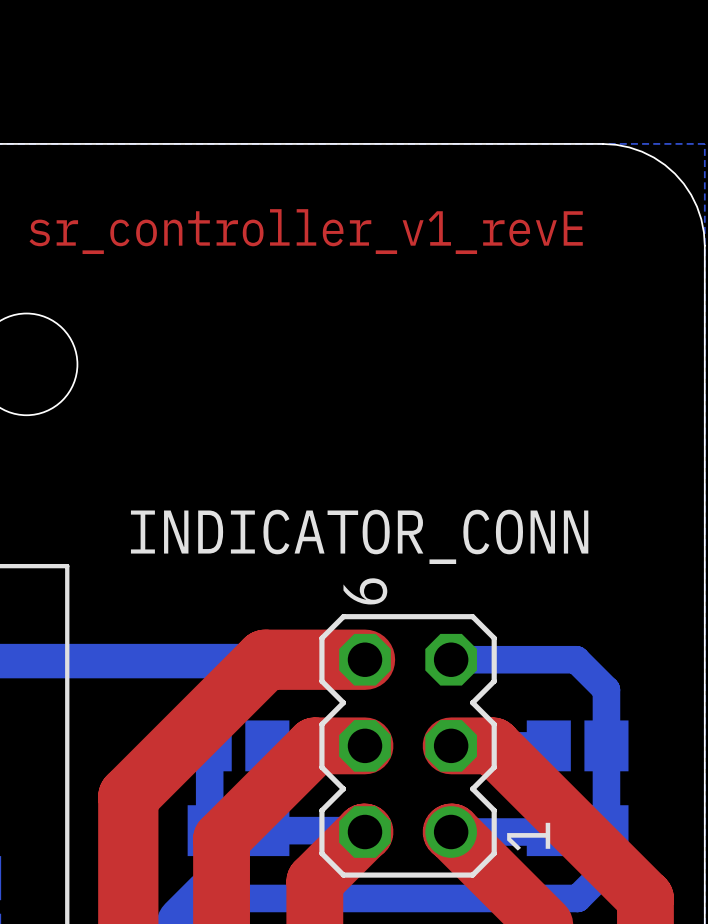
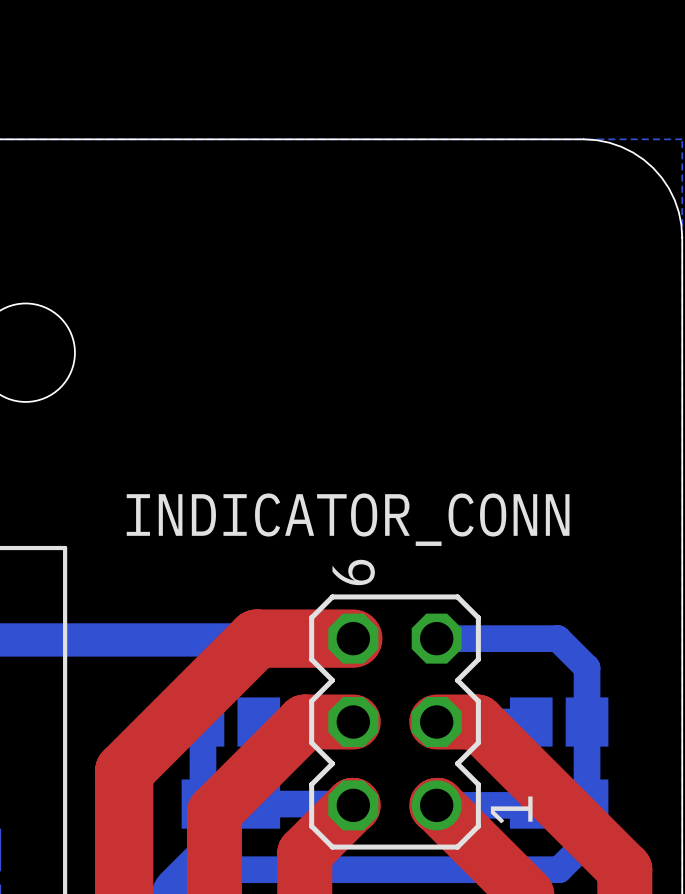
text: sr_controller_v1_revE (306, 231) -> none

